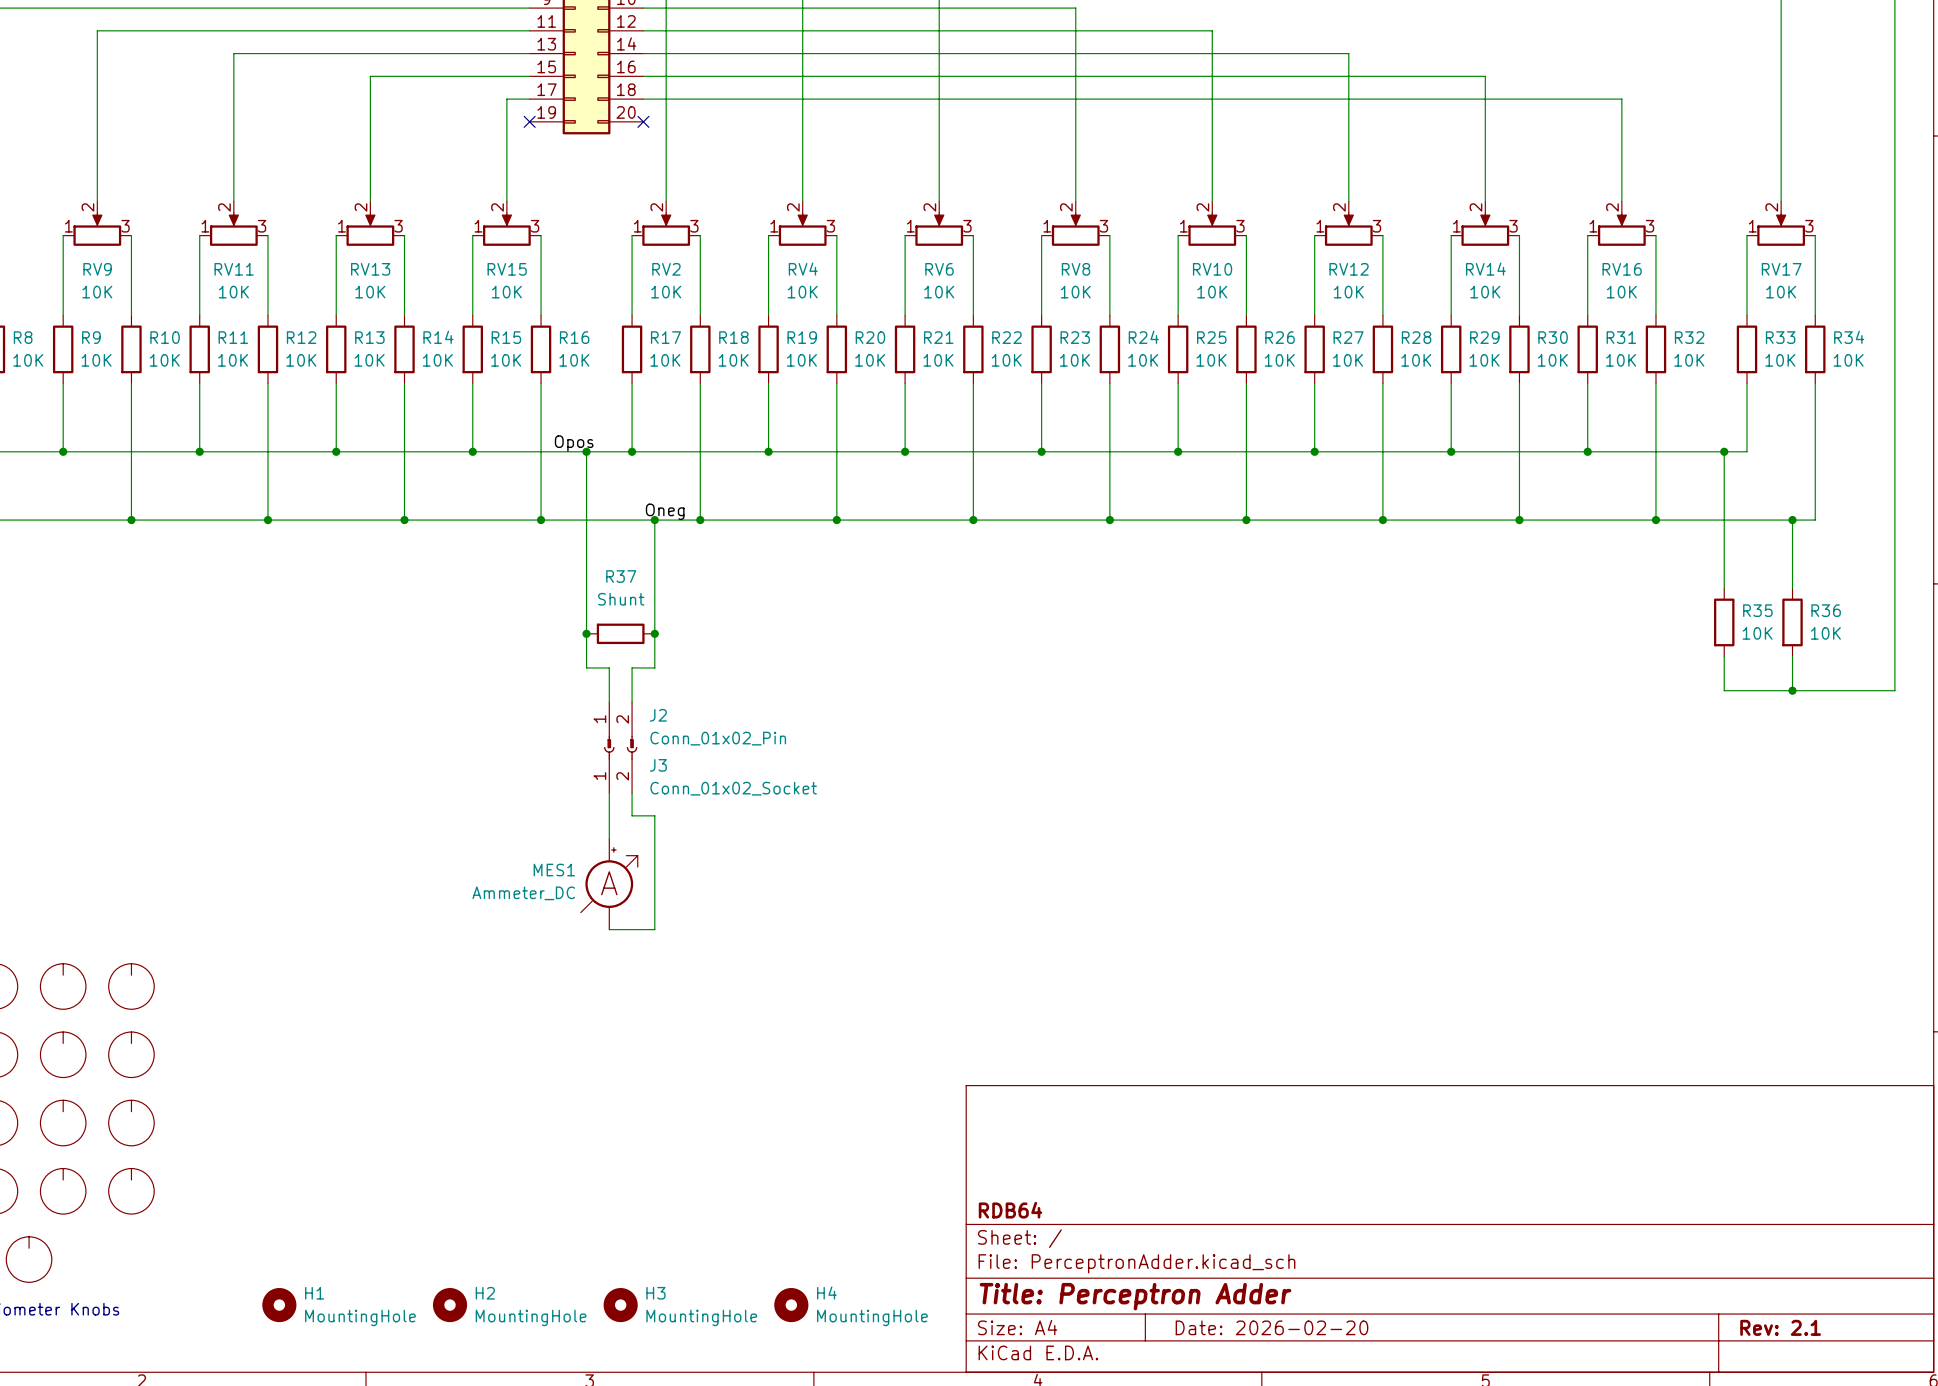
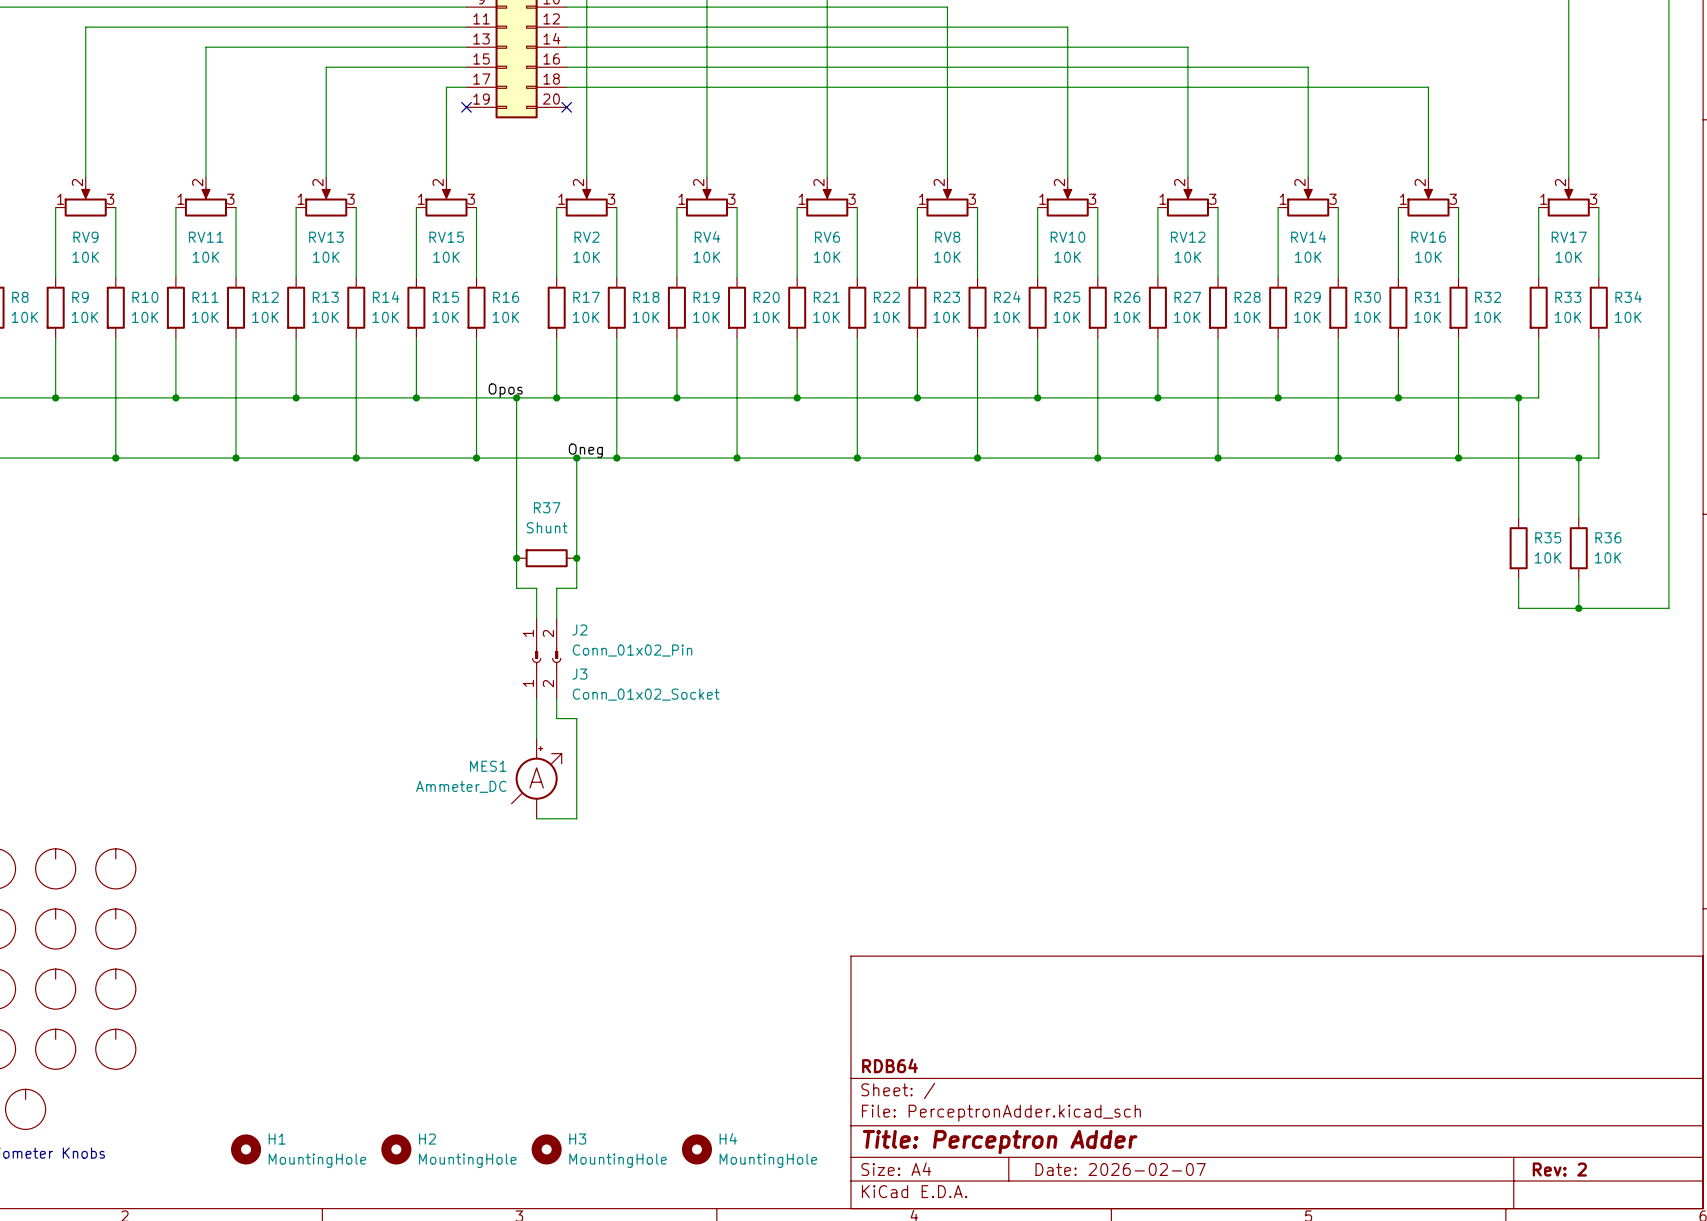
title block: Date: 2026-02-20 (1271, 1327) -> Date: 2026-02-07 (1120, 1169)
title block: Rev: 2.1 (1780, 1327) -> Rev: 2 (1559, 1169)

